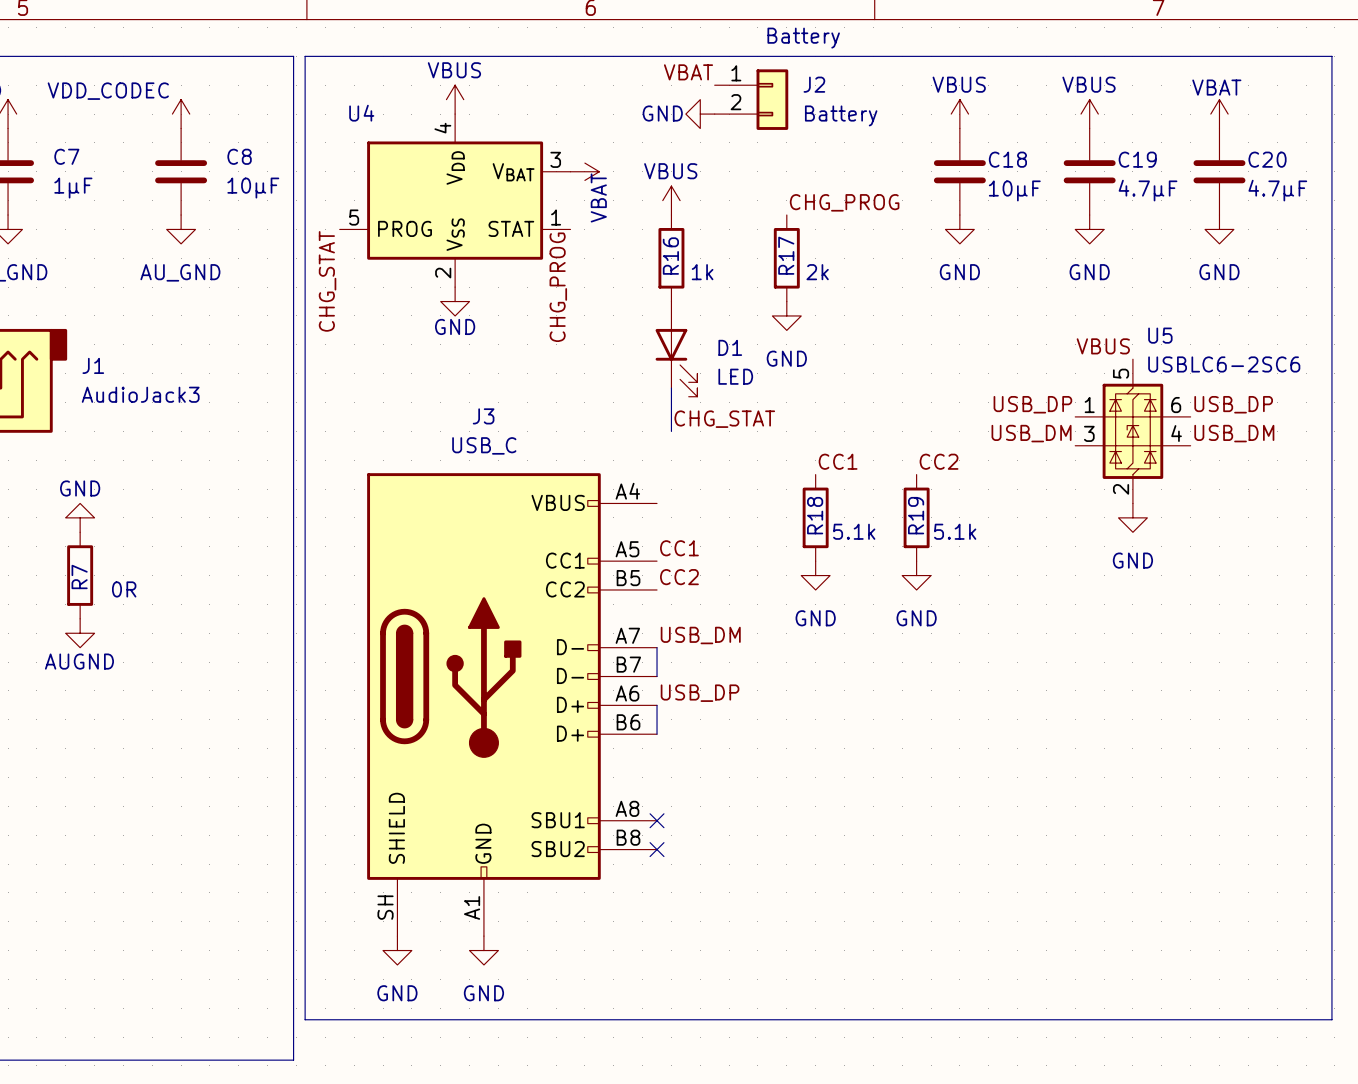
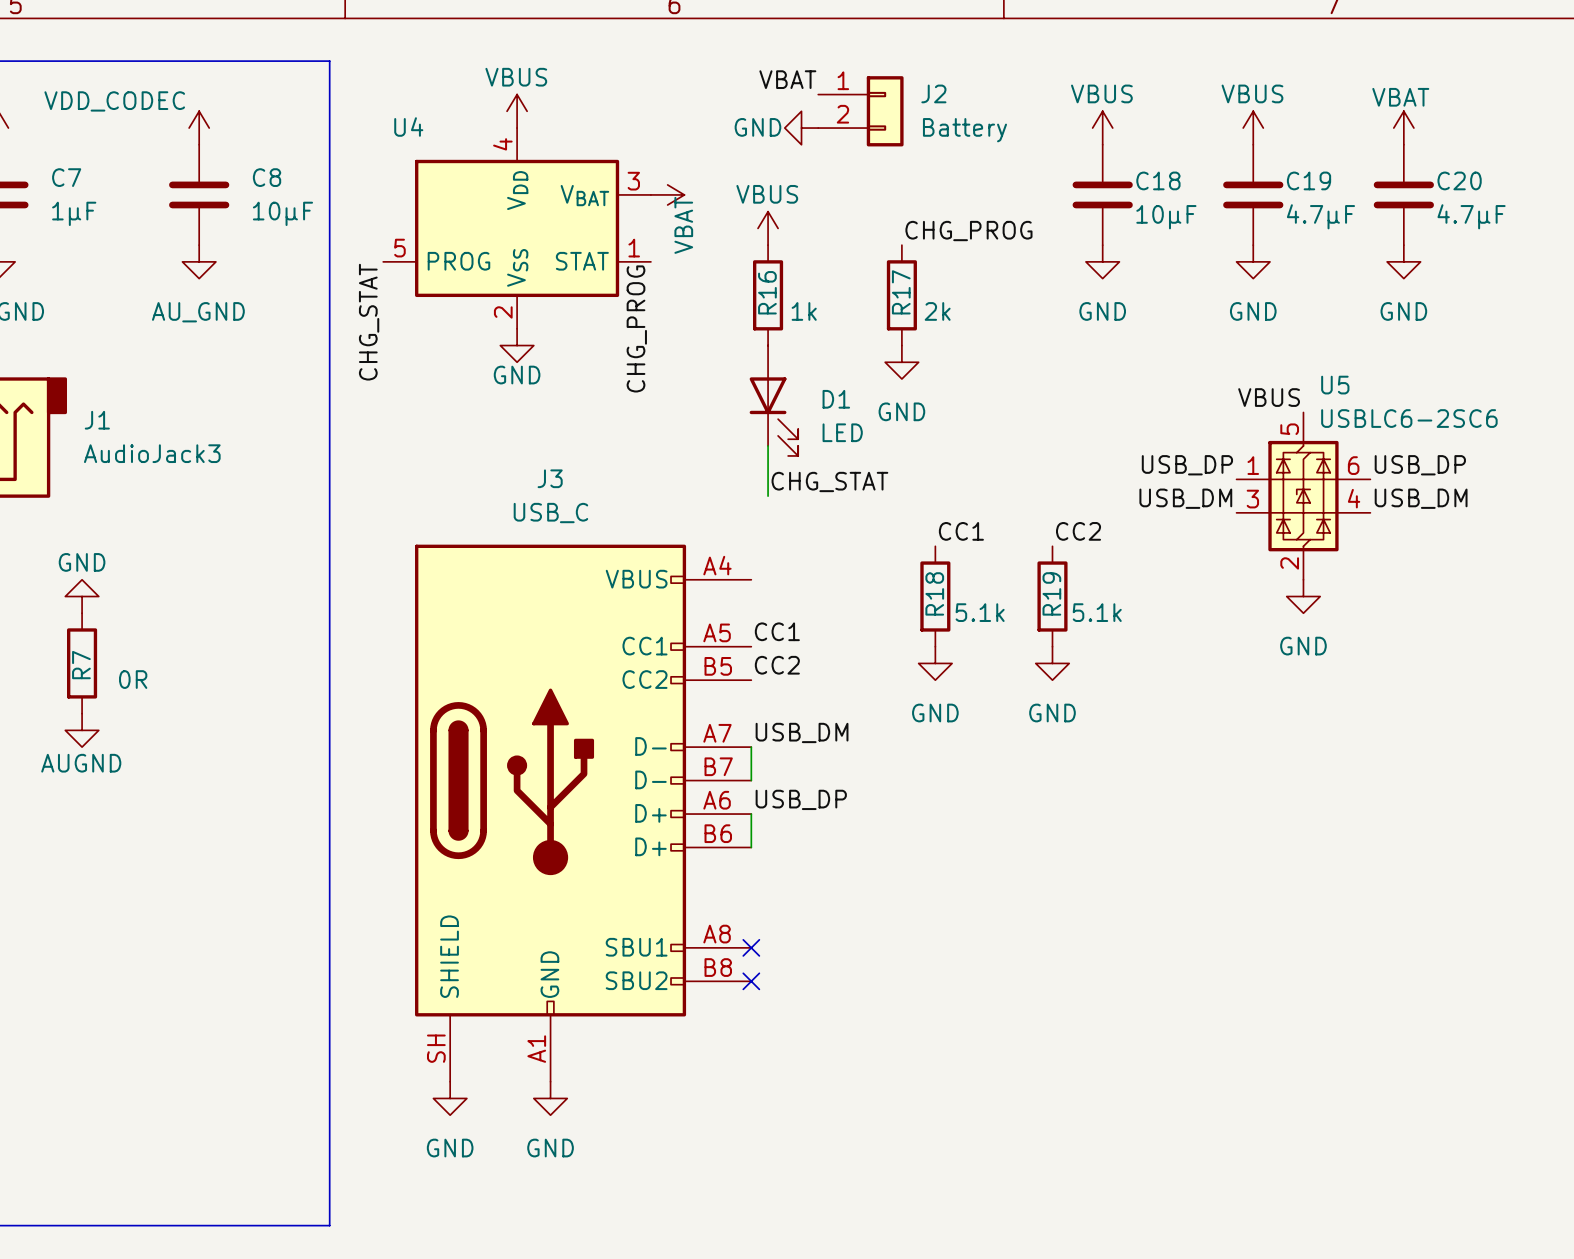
text: Battery (803, 38) -> none
line: (305, 56) (1331, 56) (1331, 1019) (305, 1019) (305, 56) -> none

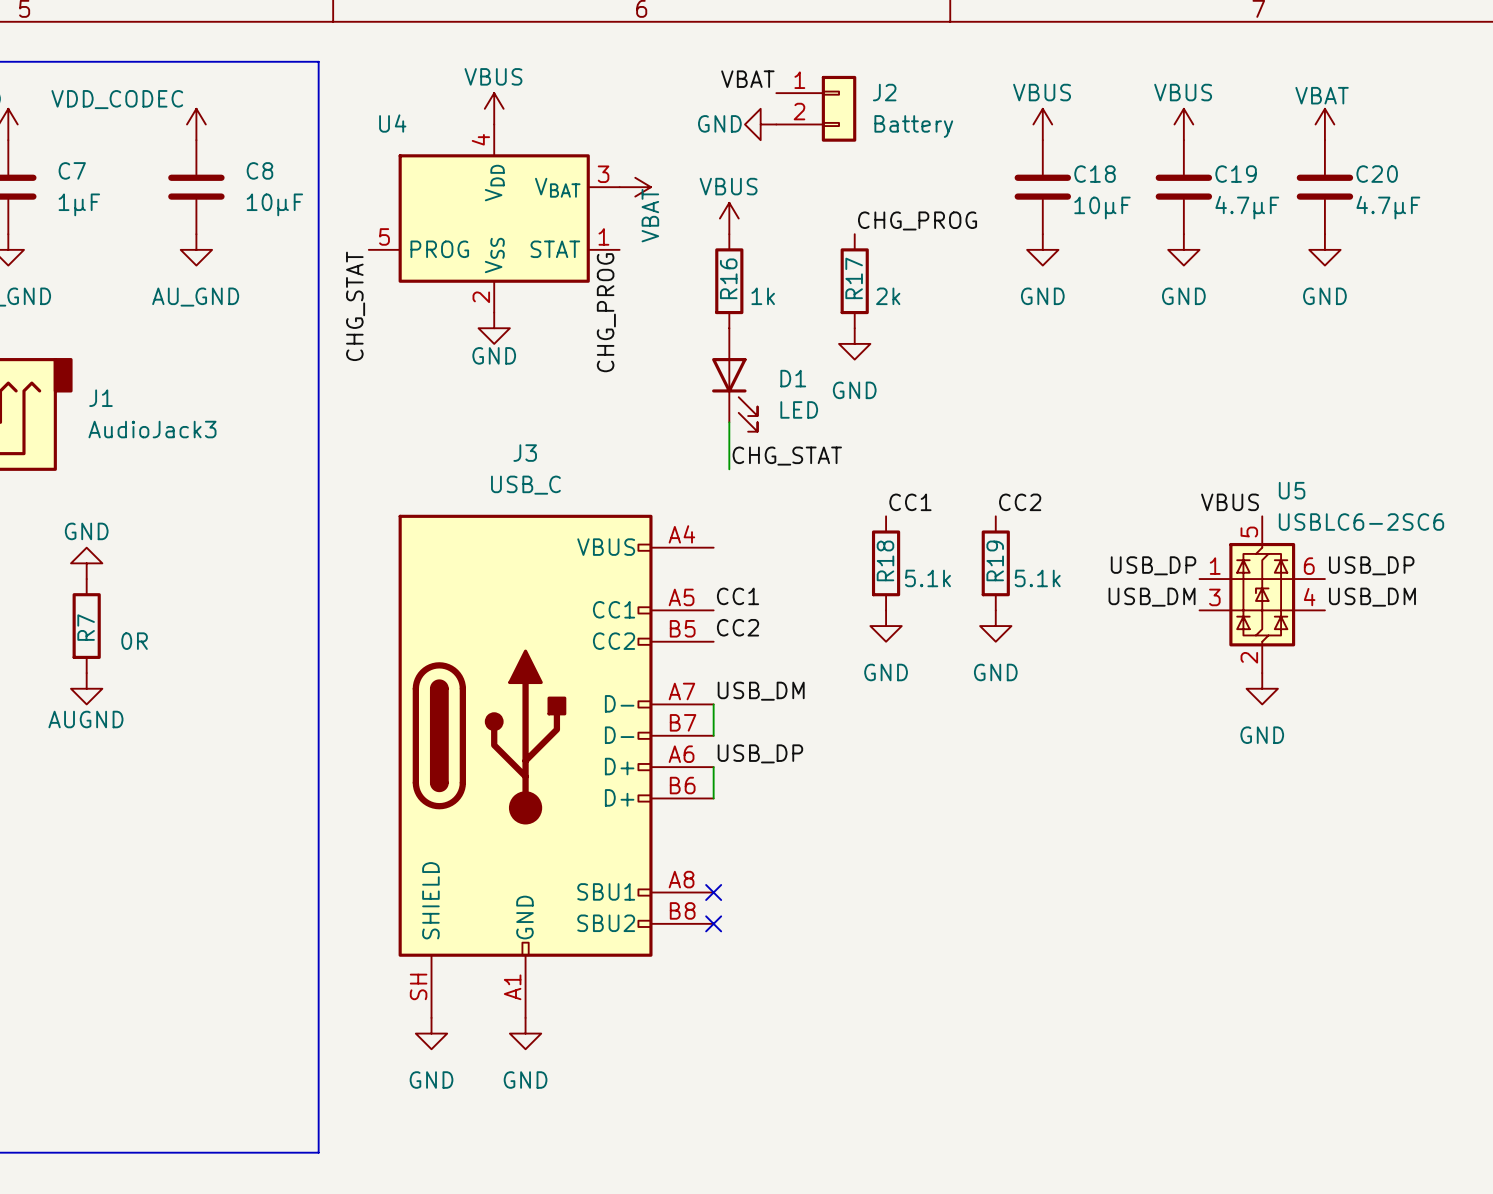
label position: VBUS (1269, 397) -> VBUS (1230, 502)
label: USB_DP (1187, 465) -> none
label: USB_DP (1420, 465) -> none
U5 position: (1303, 496) -> (1262, 594)
label: USB_DM (1185, 498) -> none
label: USB_DM (1421, 498) -> none
power symbol position: GND (1303, 596) -> GND (1262, 688)
label: none -> USB_DP (1153, 565)
label: none -> USB_DP (1371, 565)
label: none -> USB_DM (1152, 597)
label: none -> USB_DM (1372, 597)

